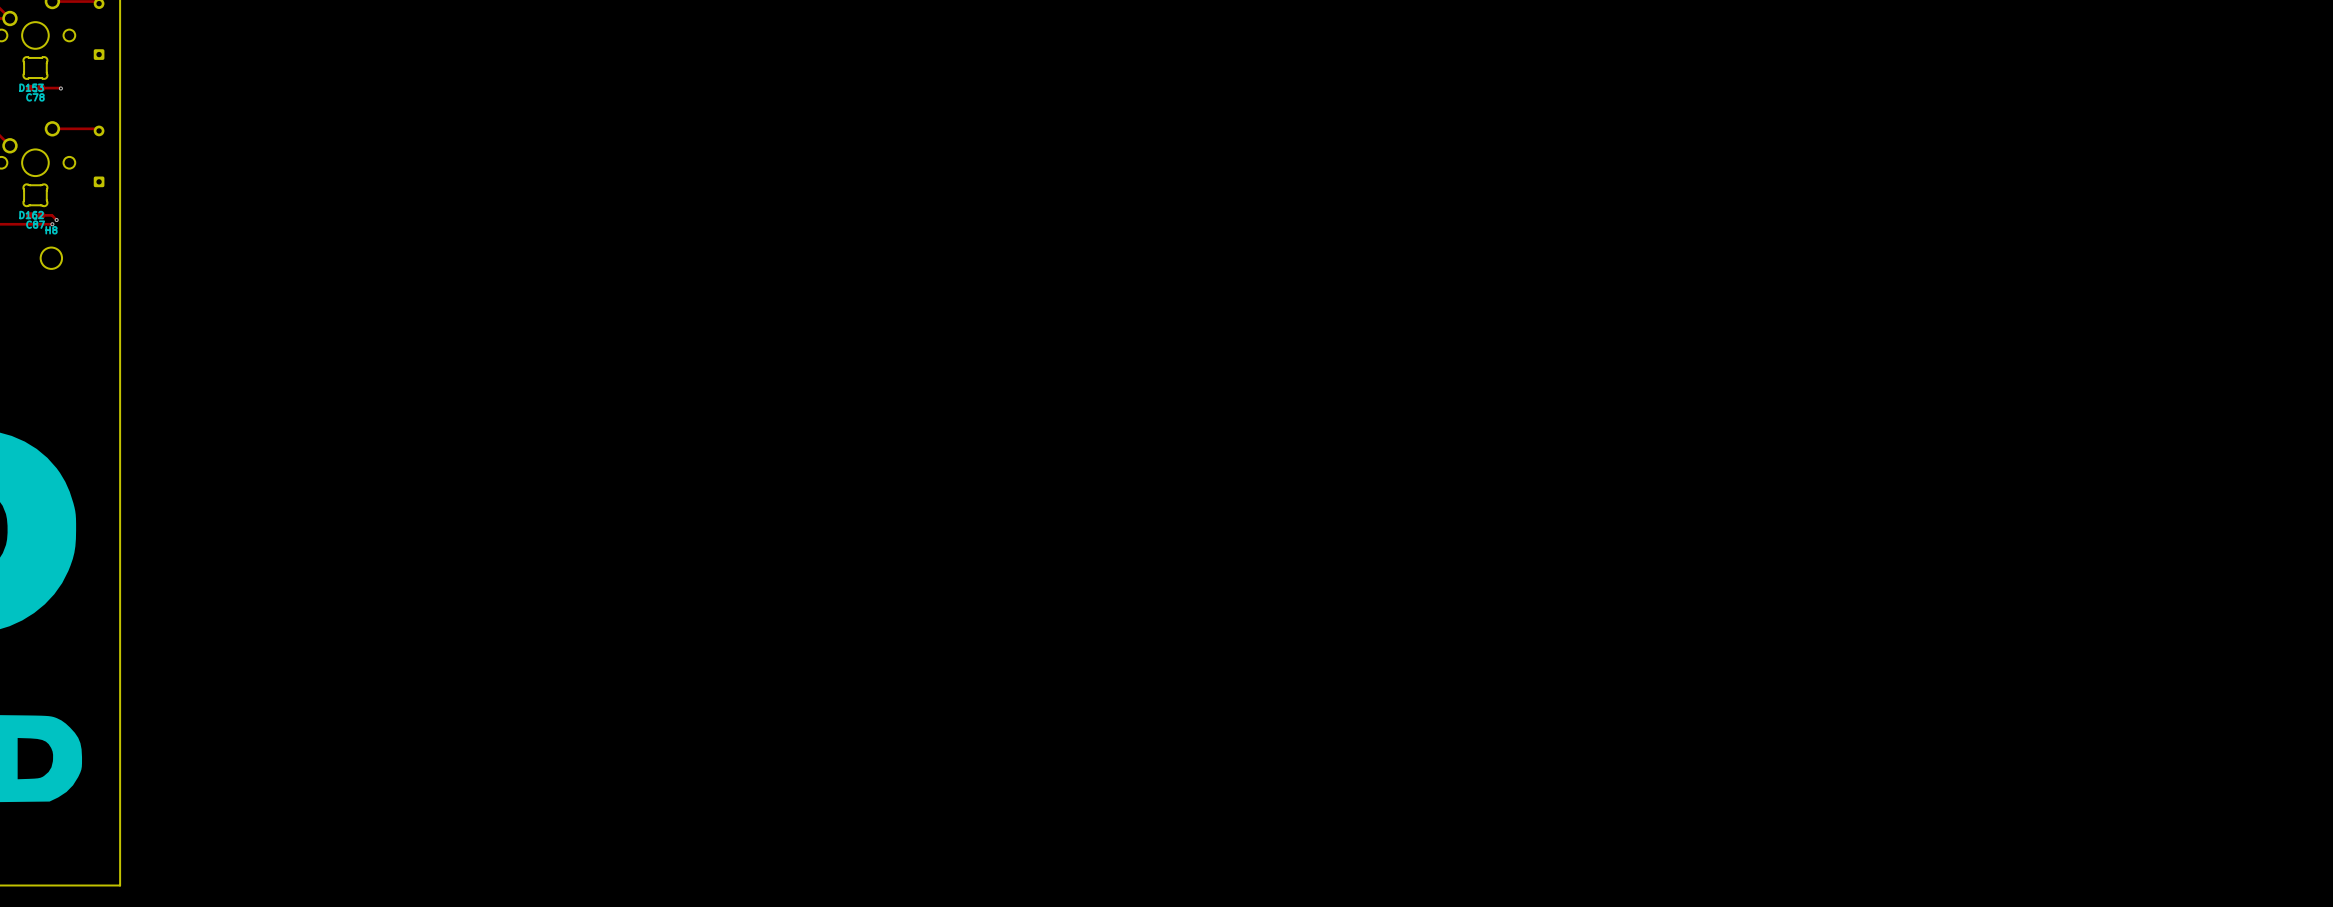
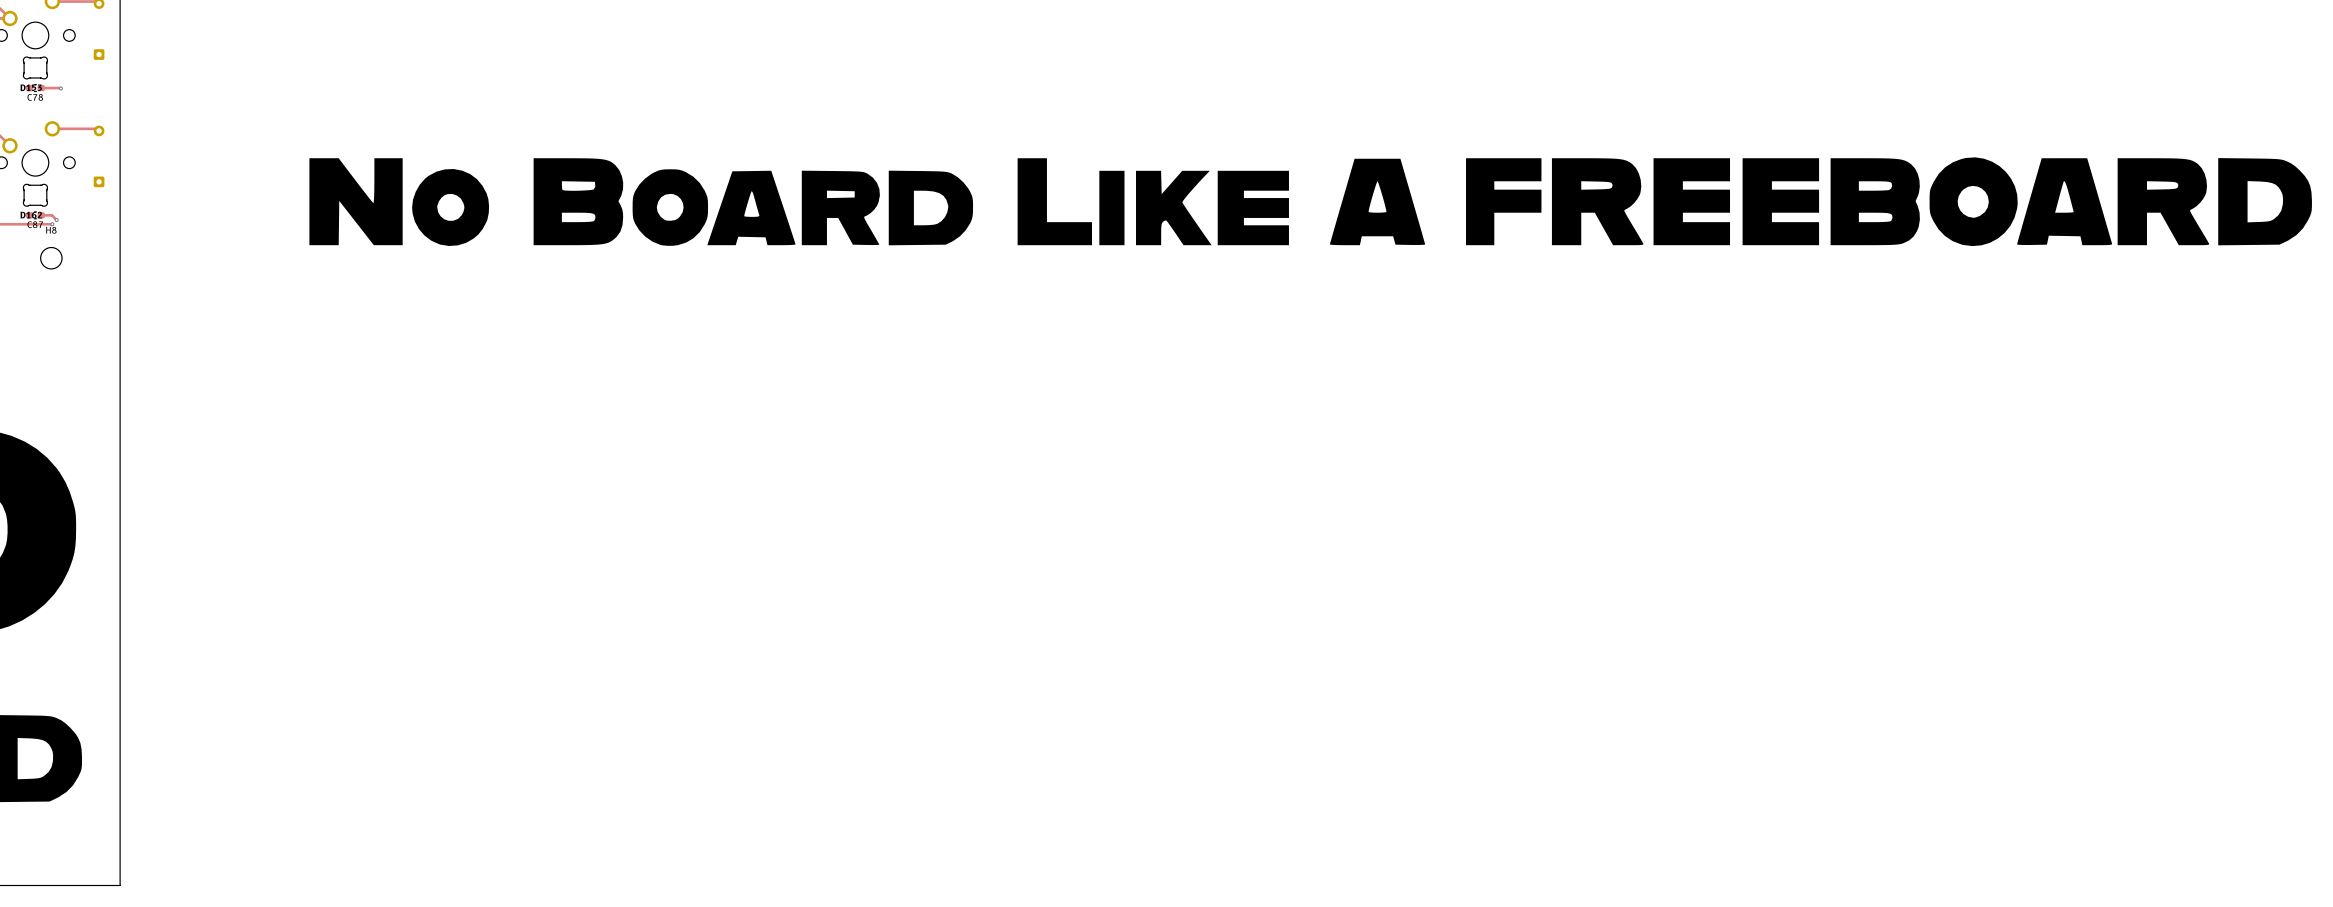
drawing: none -> [309, 157, 2312, 247]

